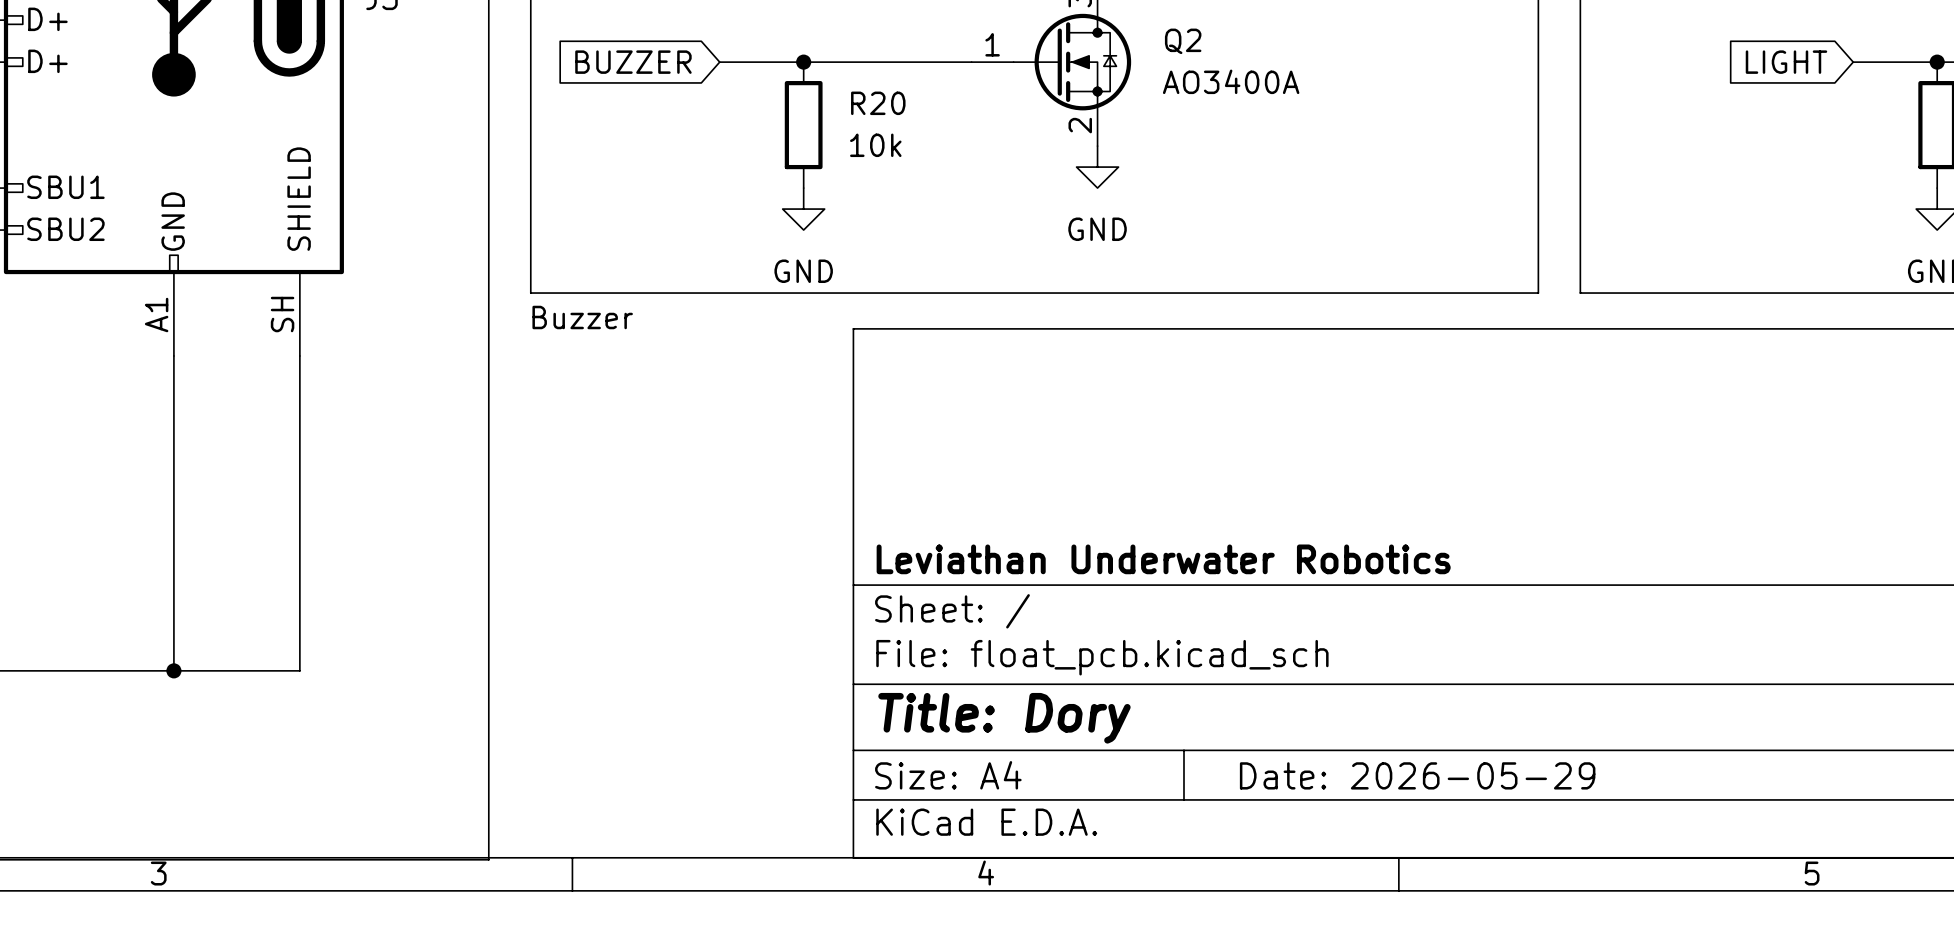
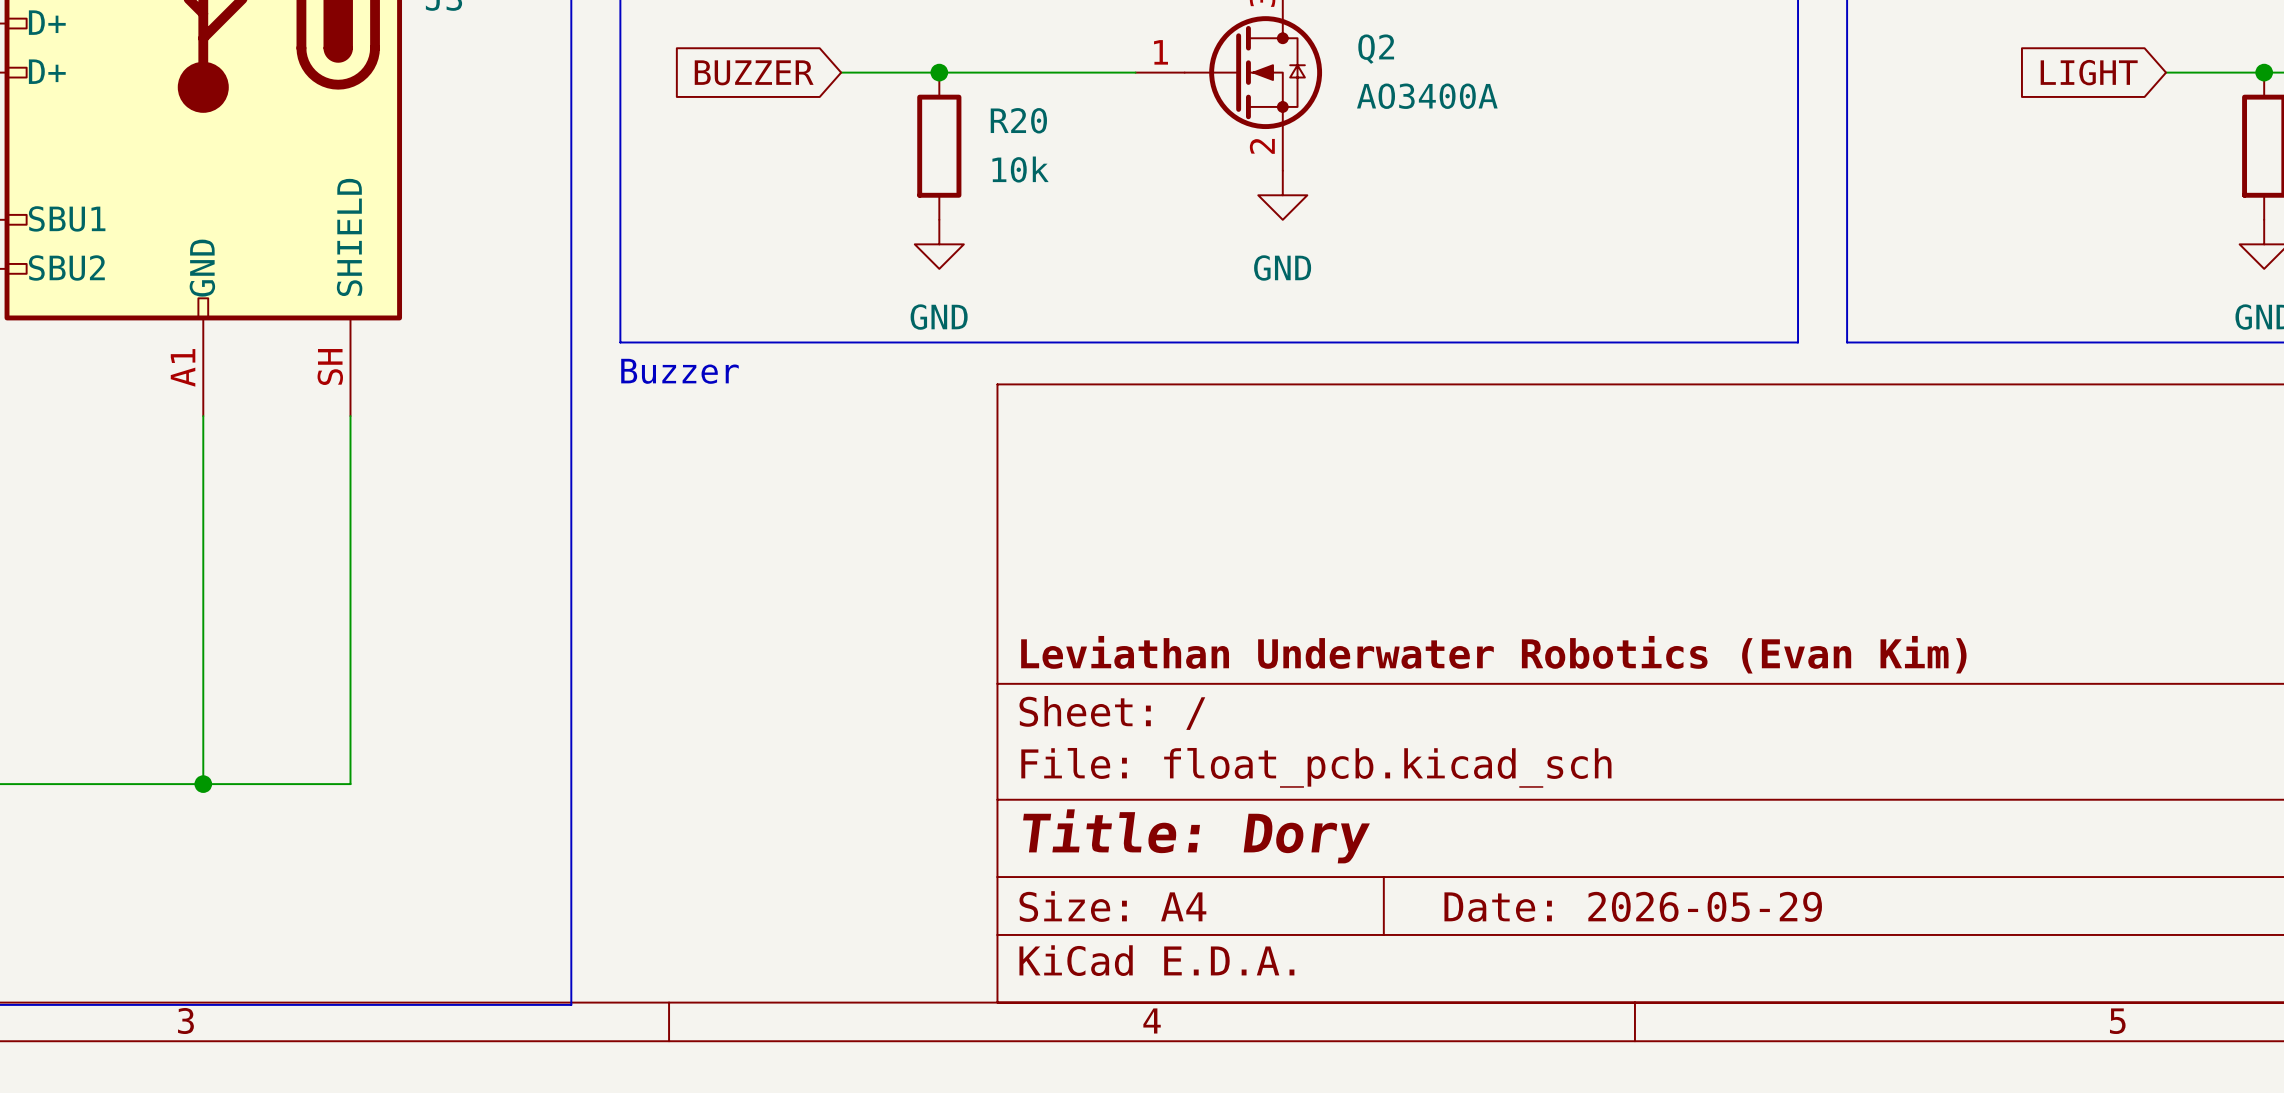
title block: Leviathan Underwater Robotics (1163, 559) -> Leviathan Underwater Robotics (Evan Kim) (1493, 654)

